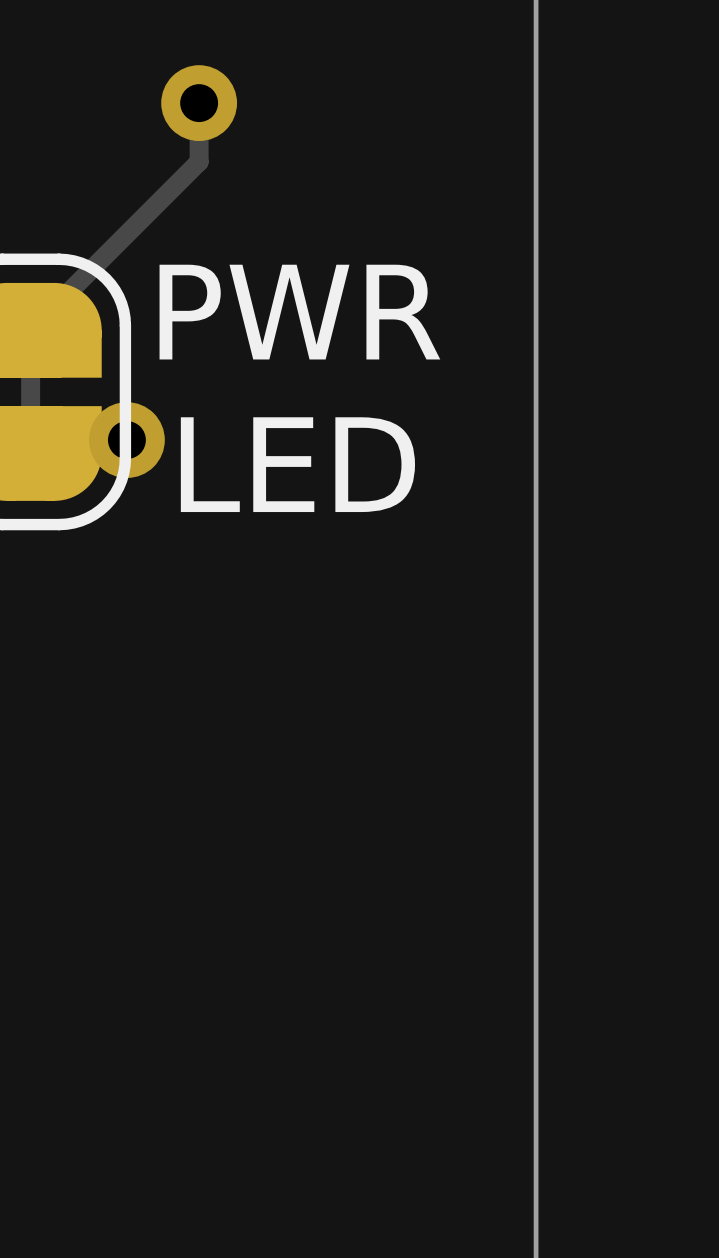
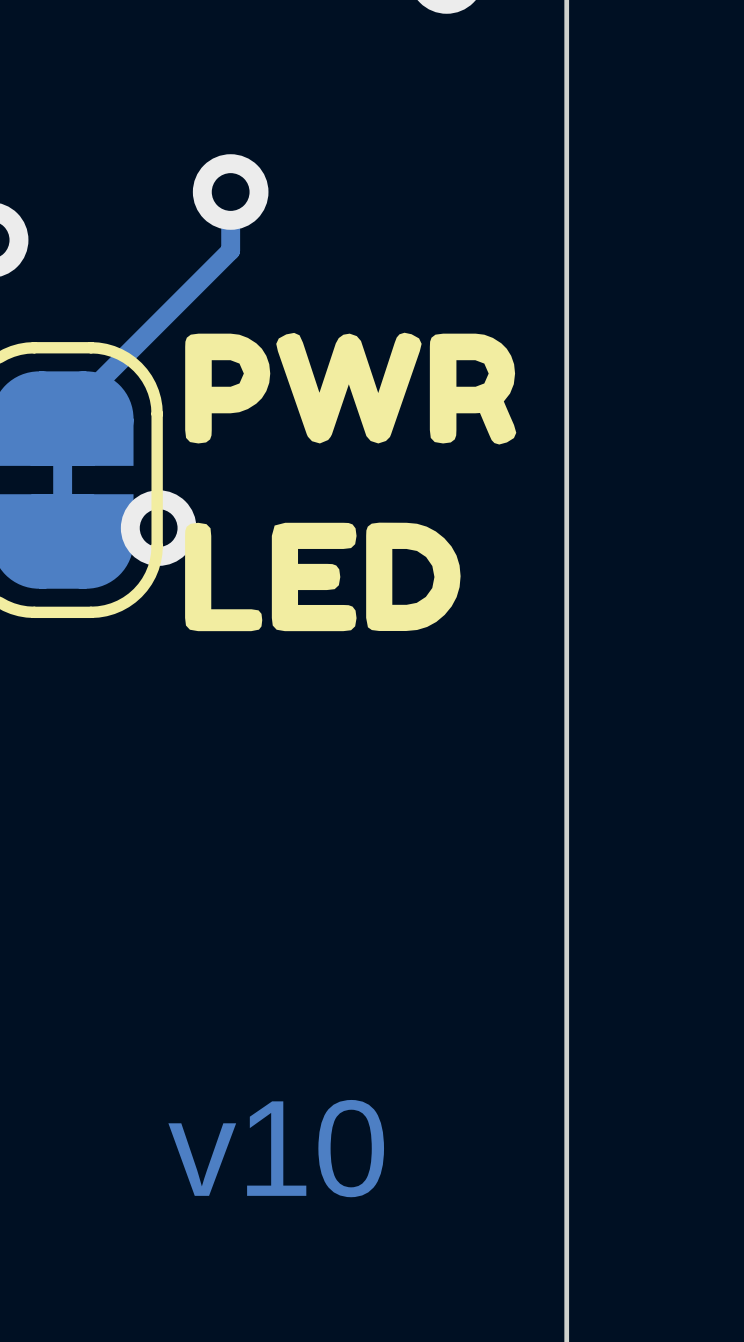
drawing: none -> [185, 332, 517, 632]
text: PWR (299, 312) -> none
text: LED (297, 464) -> none
text: none -> v10 (276, 1148)

